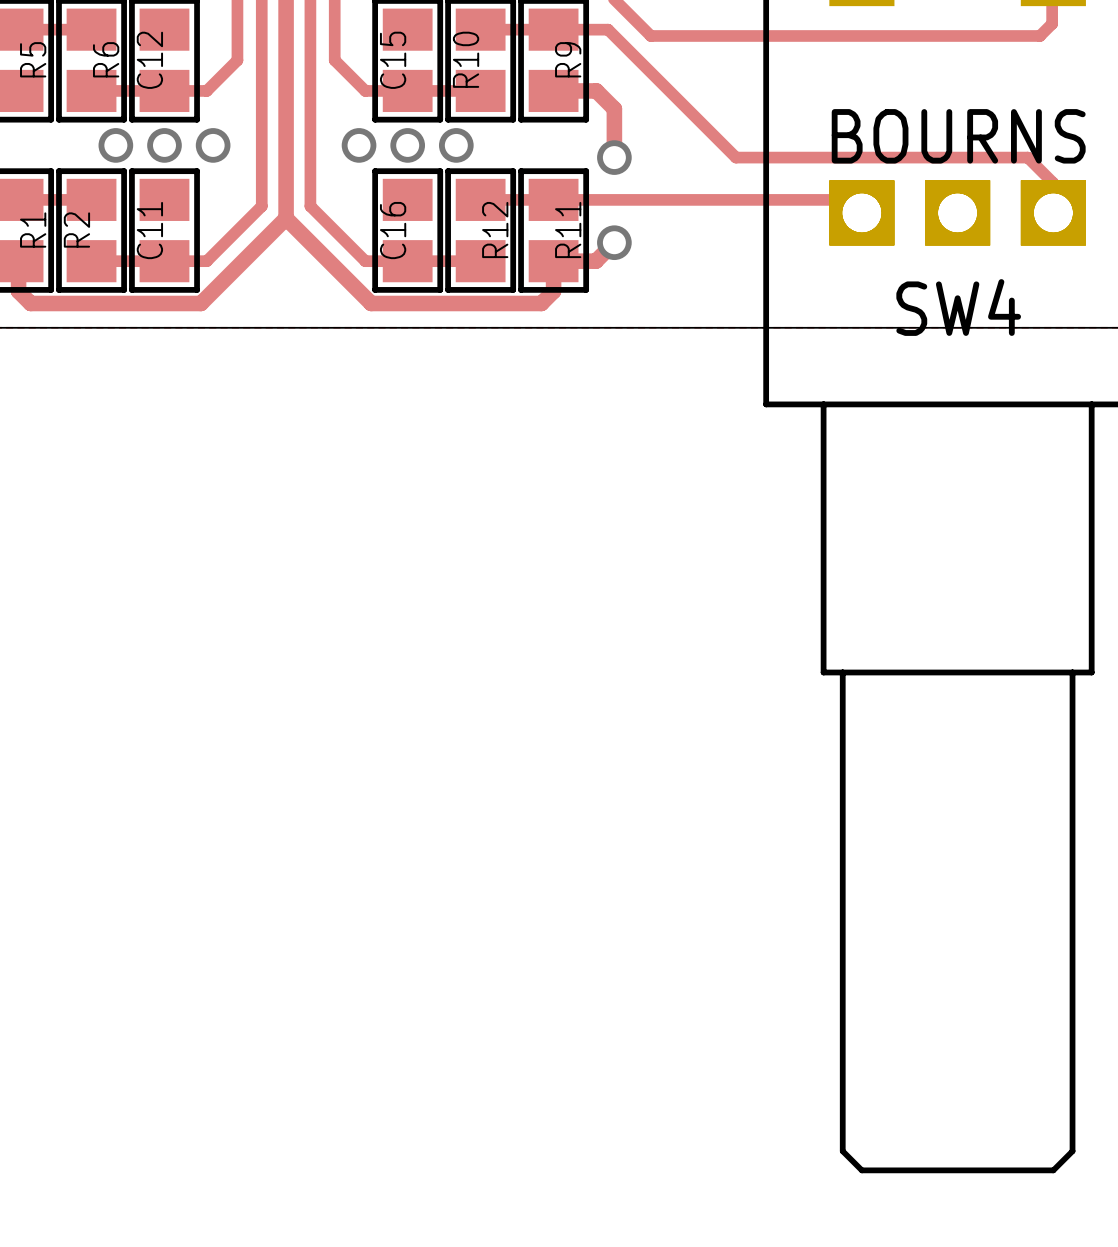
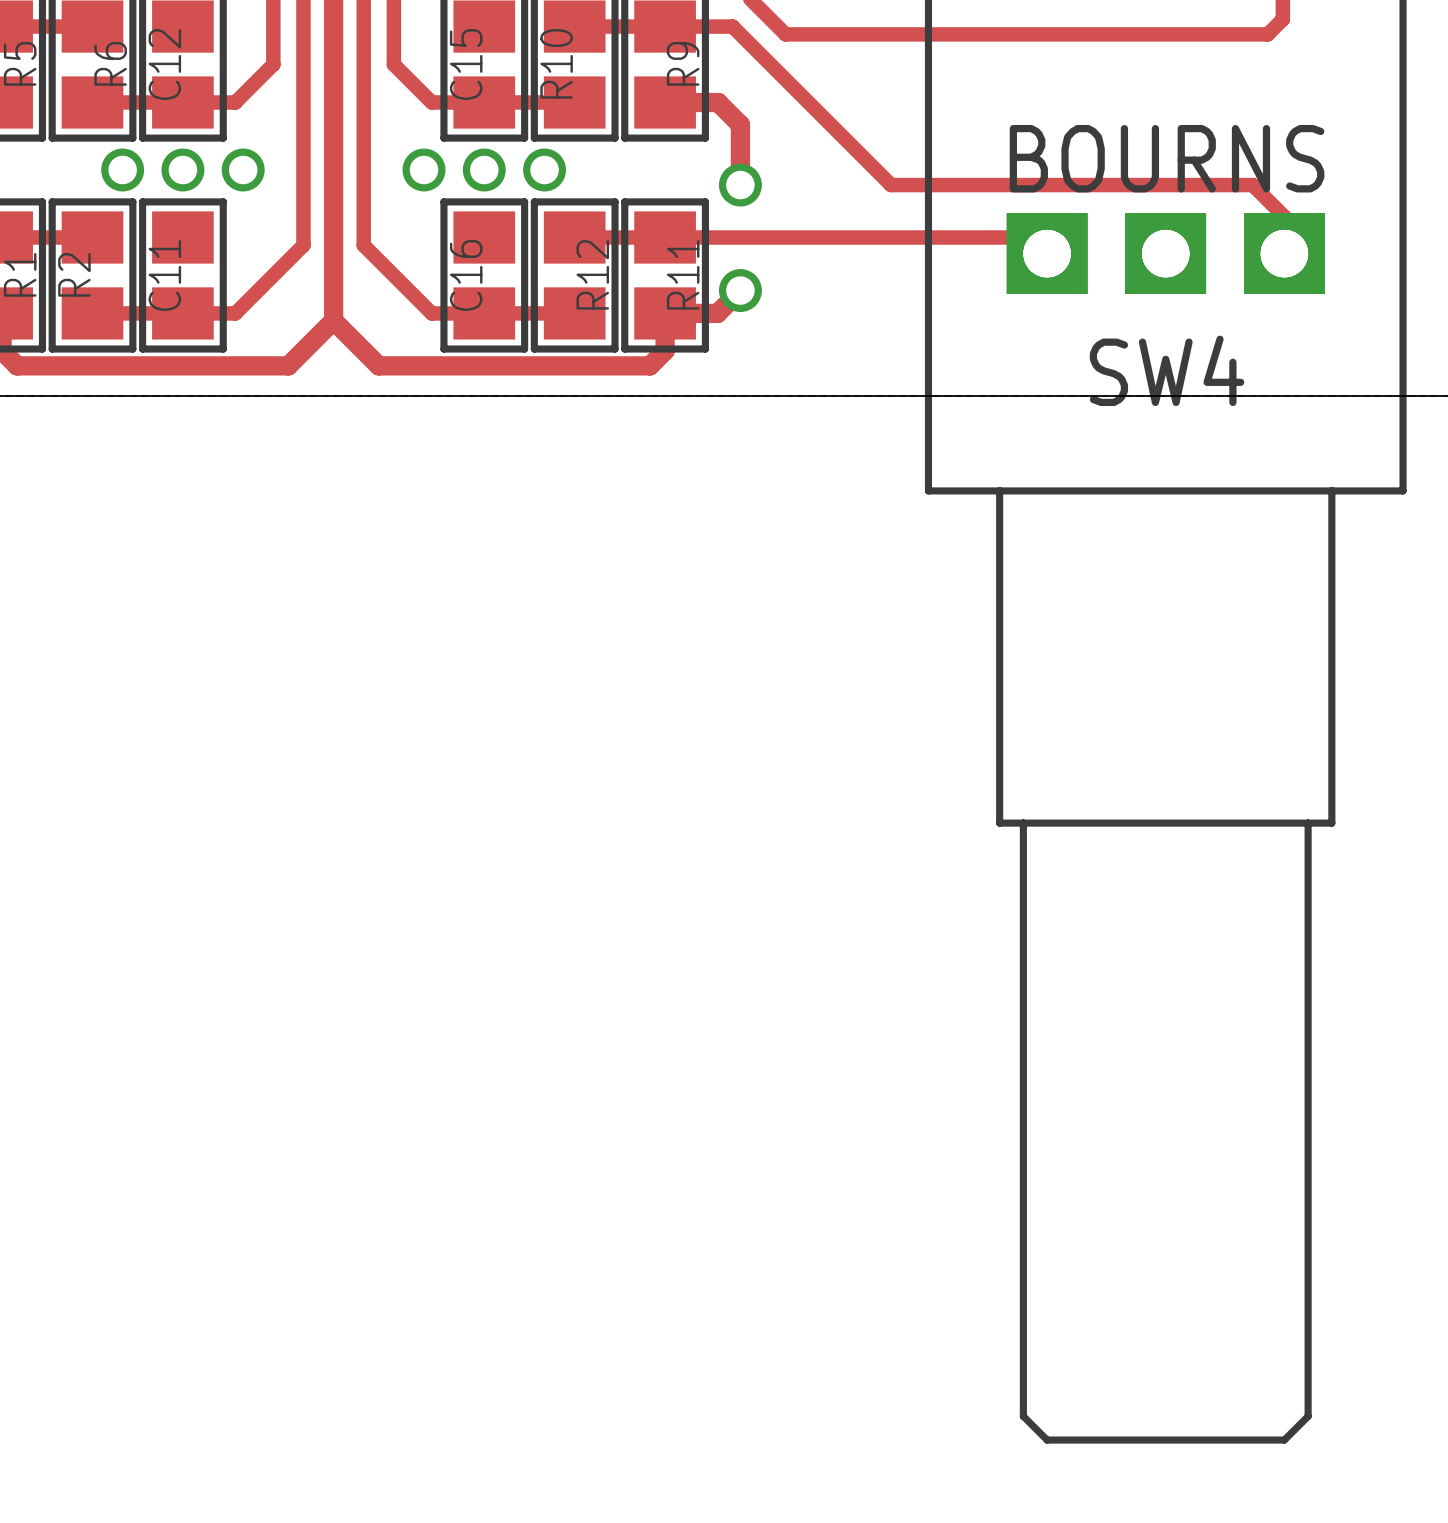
track: none -> (333, 260) (333, 320)
track: none -> (333, 320) (378, 365) (439, 365)
track: (200, 303) (286, 218) (371, 303) -> (228, 365) (288, 365) (333, 320)

